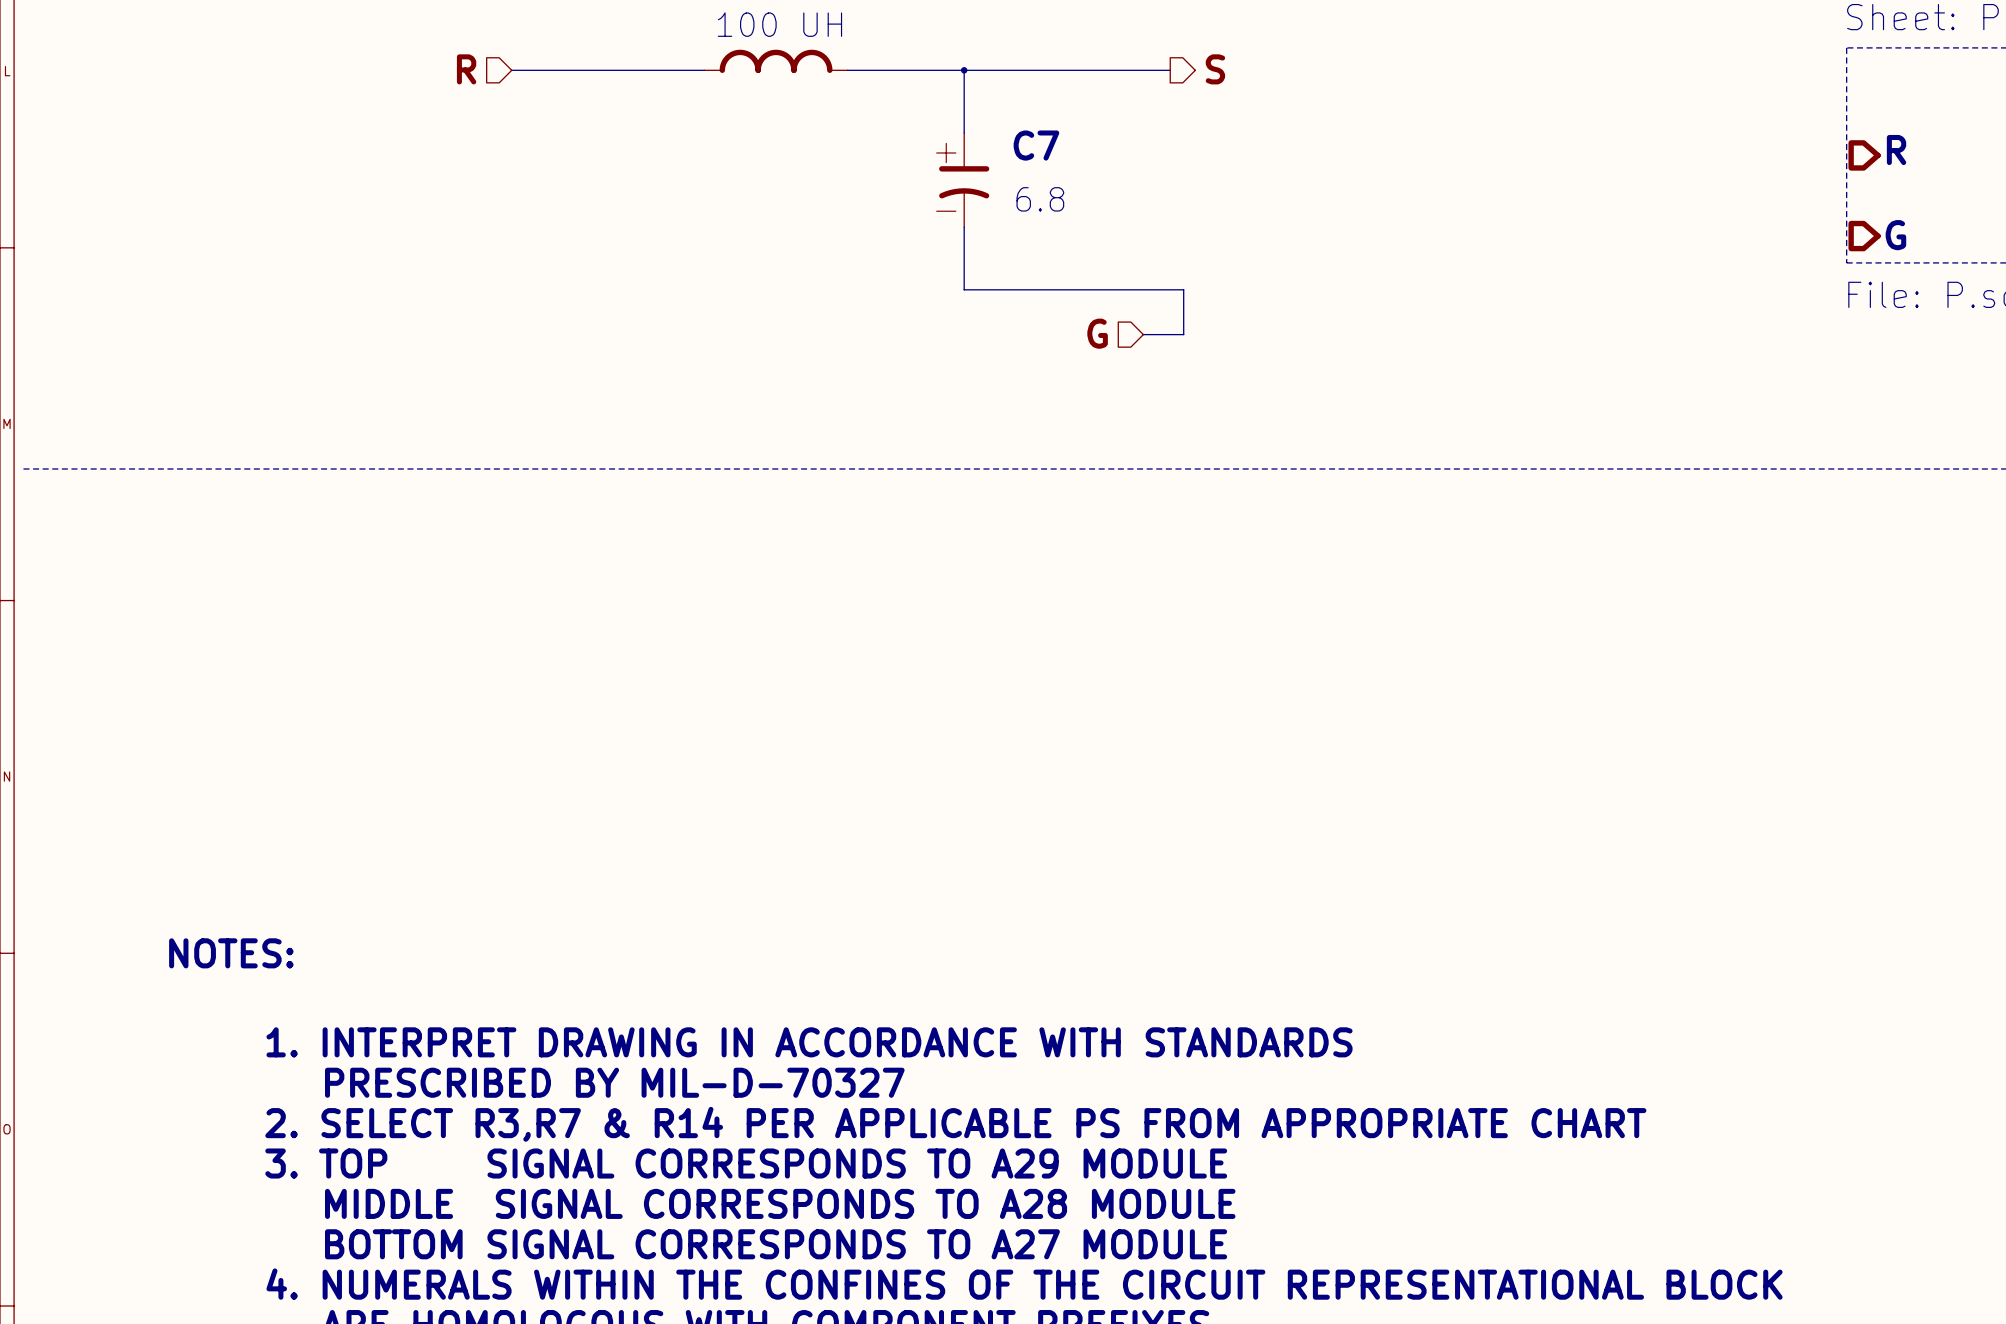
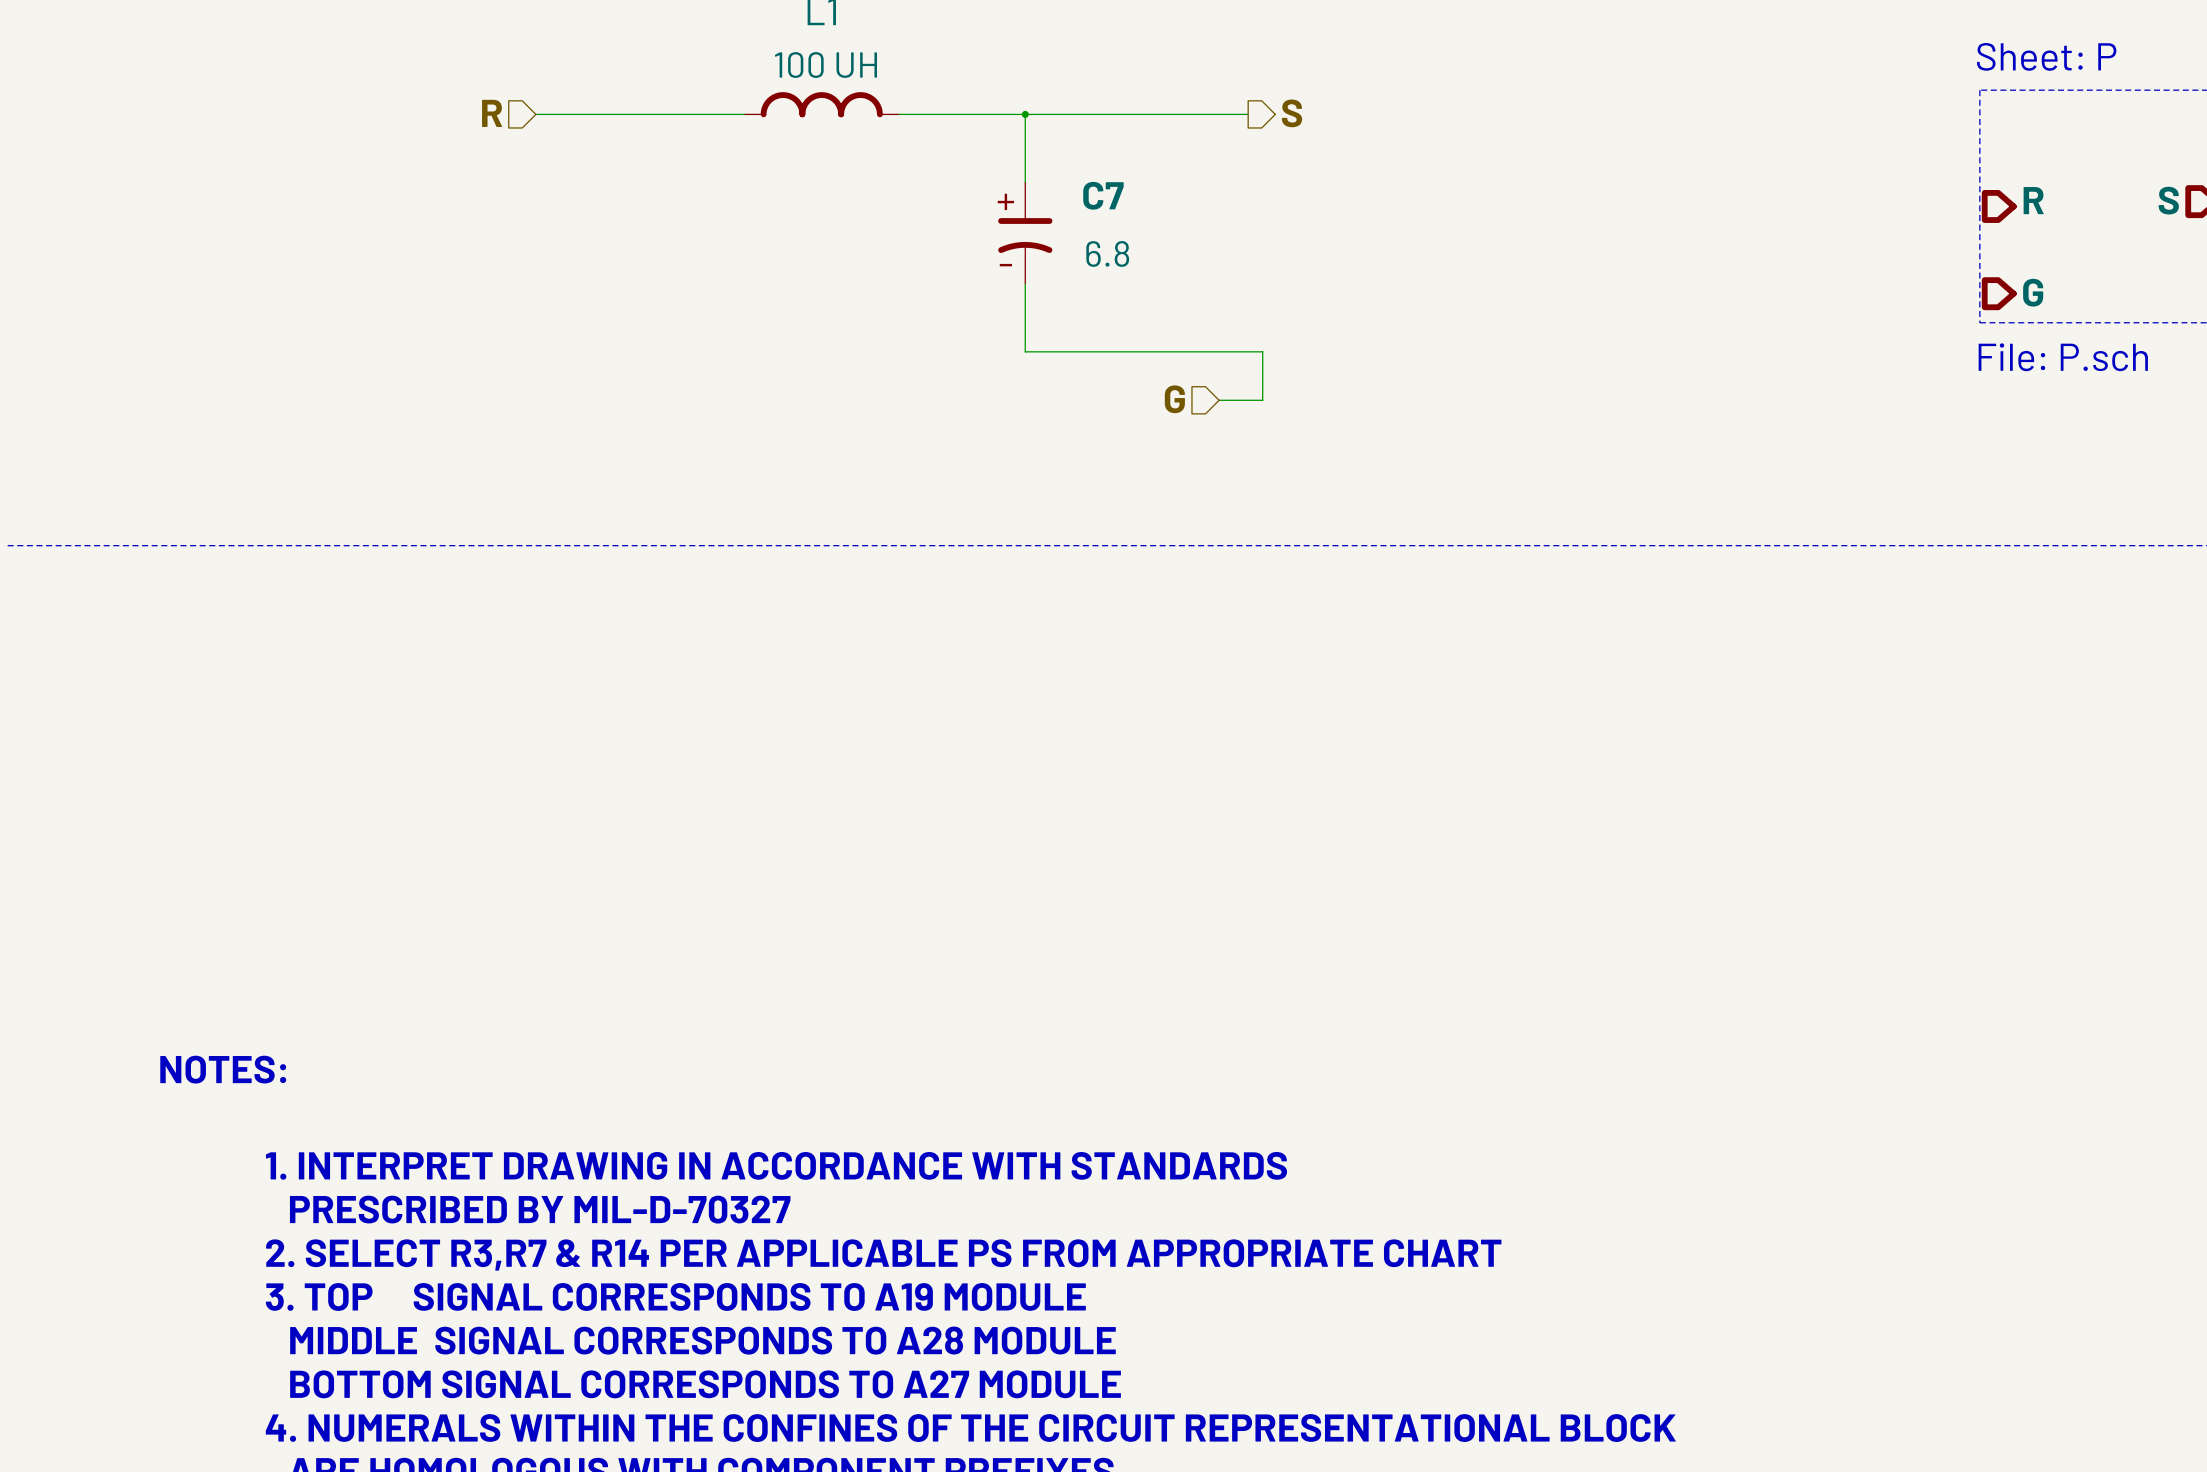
text: 3. TOP SIGNAL CORRESPONDS TO A29 MODULE (746, 1163) -> 3. TOP SIGNAL CORRESPONDS TO A19 MODULE (675, 1296)

